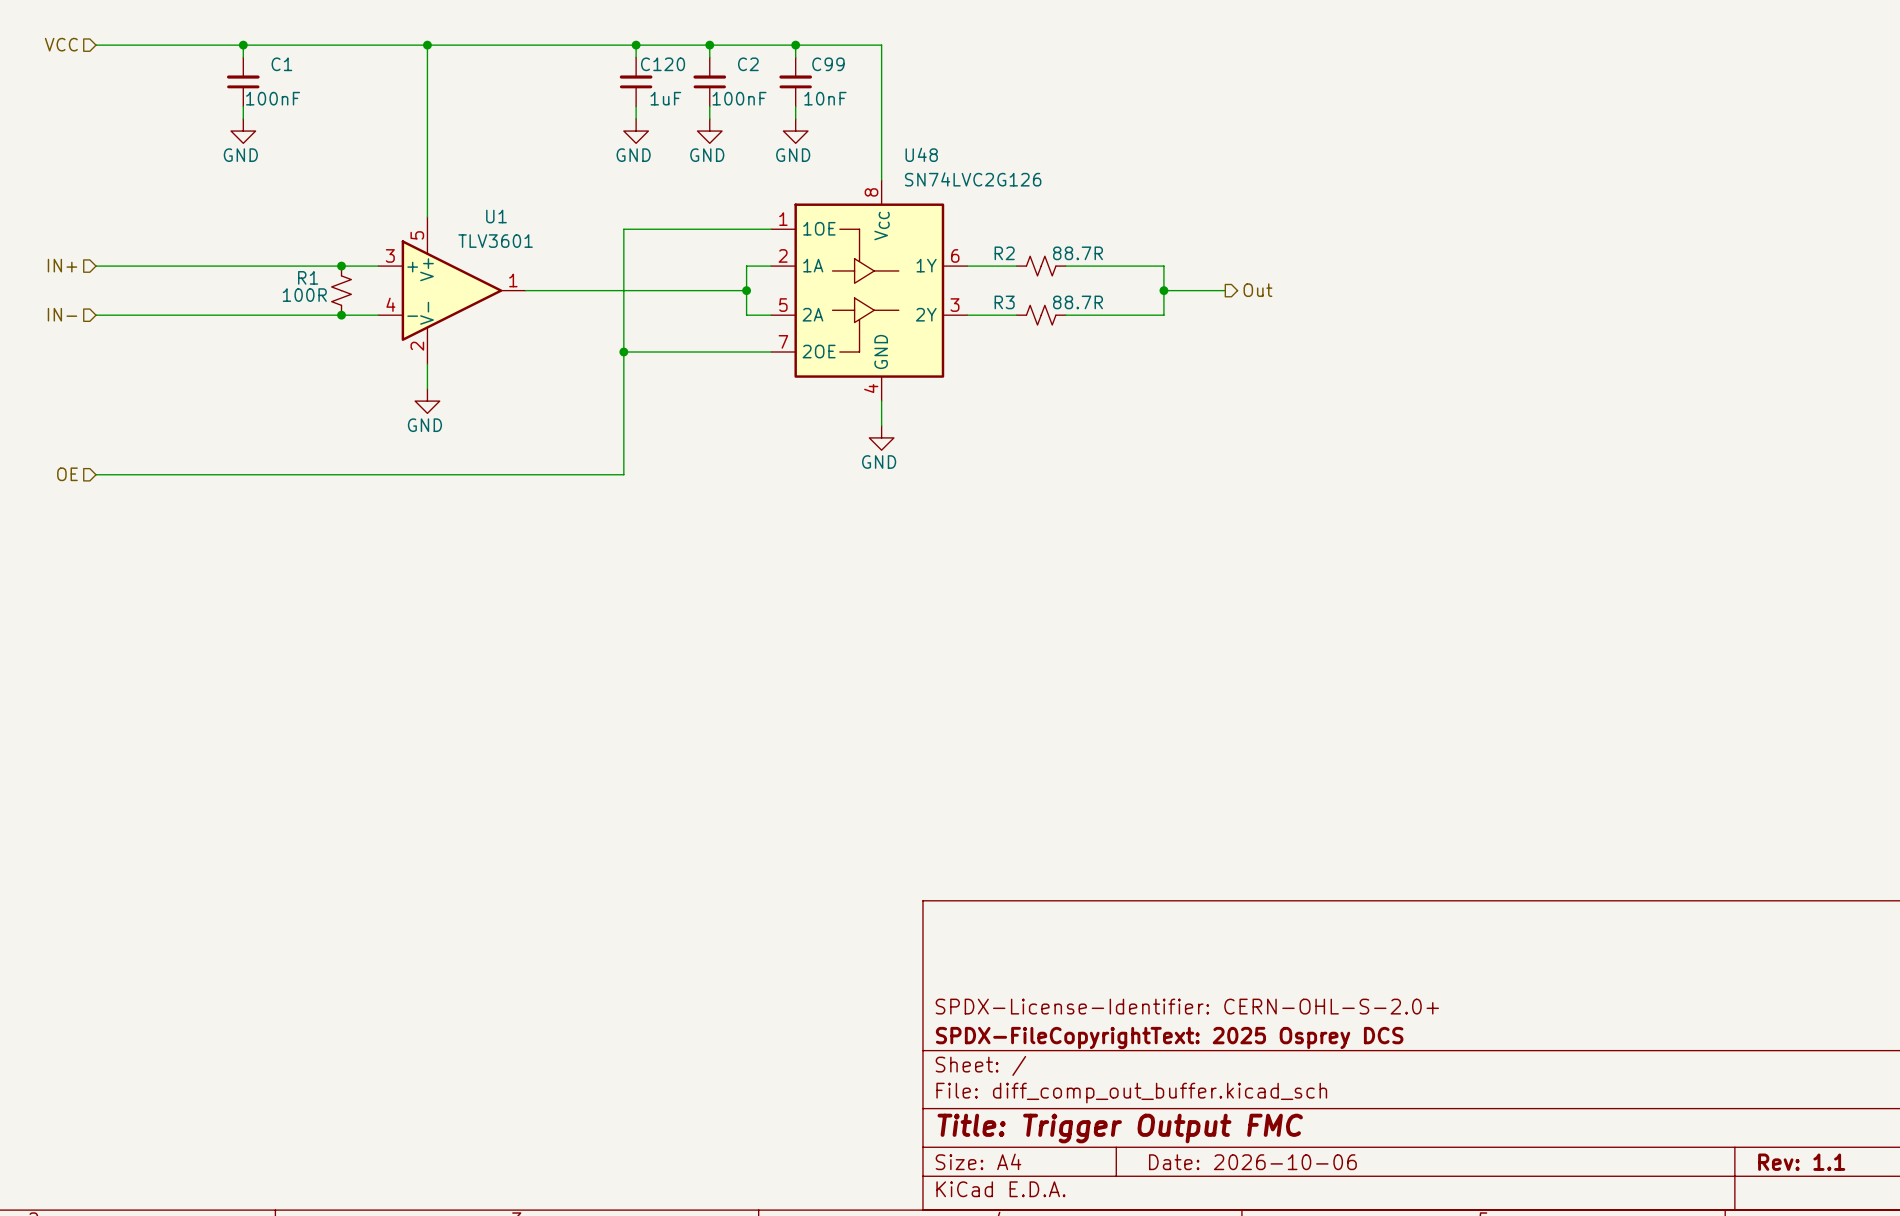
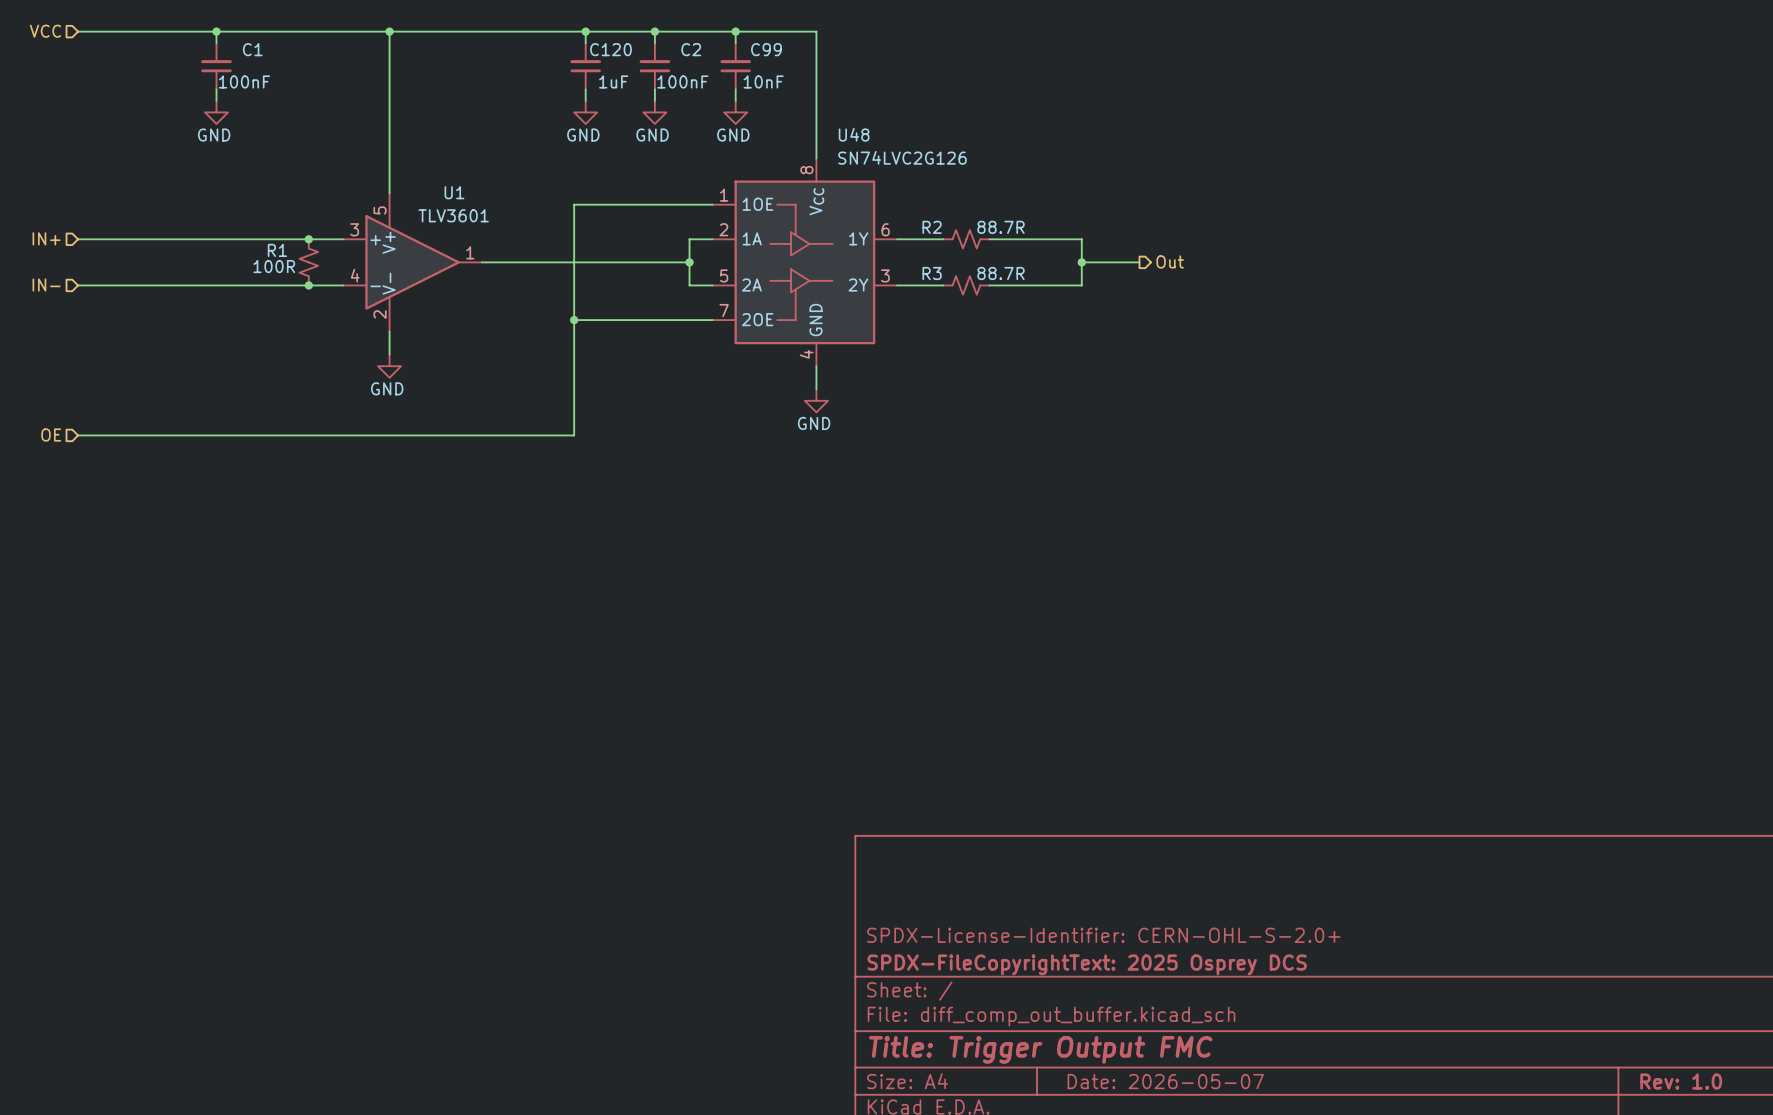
title block: Date: 2026-10-06 (1252, 1162) -> Date: 2026-05-07 (1165, 1081)
title block: Rev: 1.1 (1801, 1162) -> Rev: 1.0 (1681, 1081)

